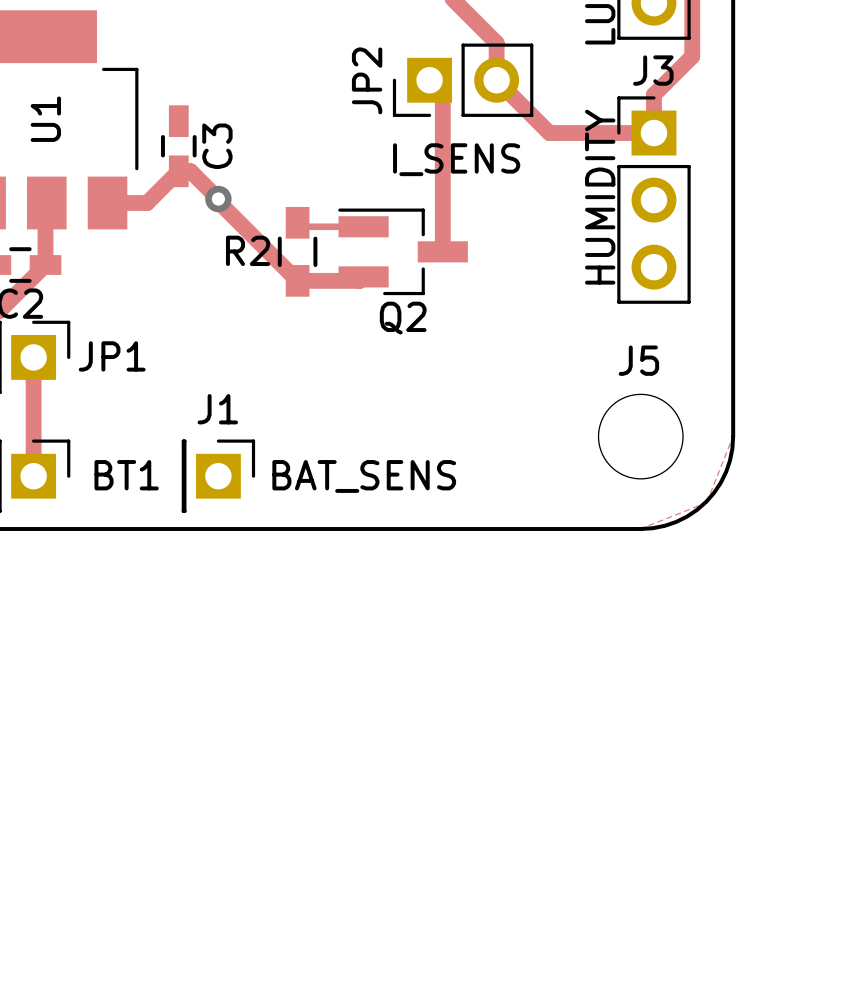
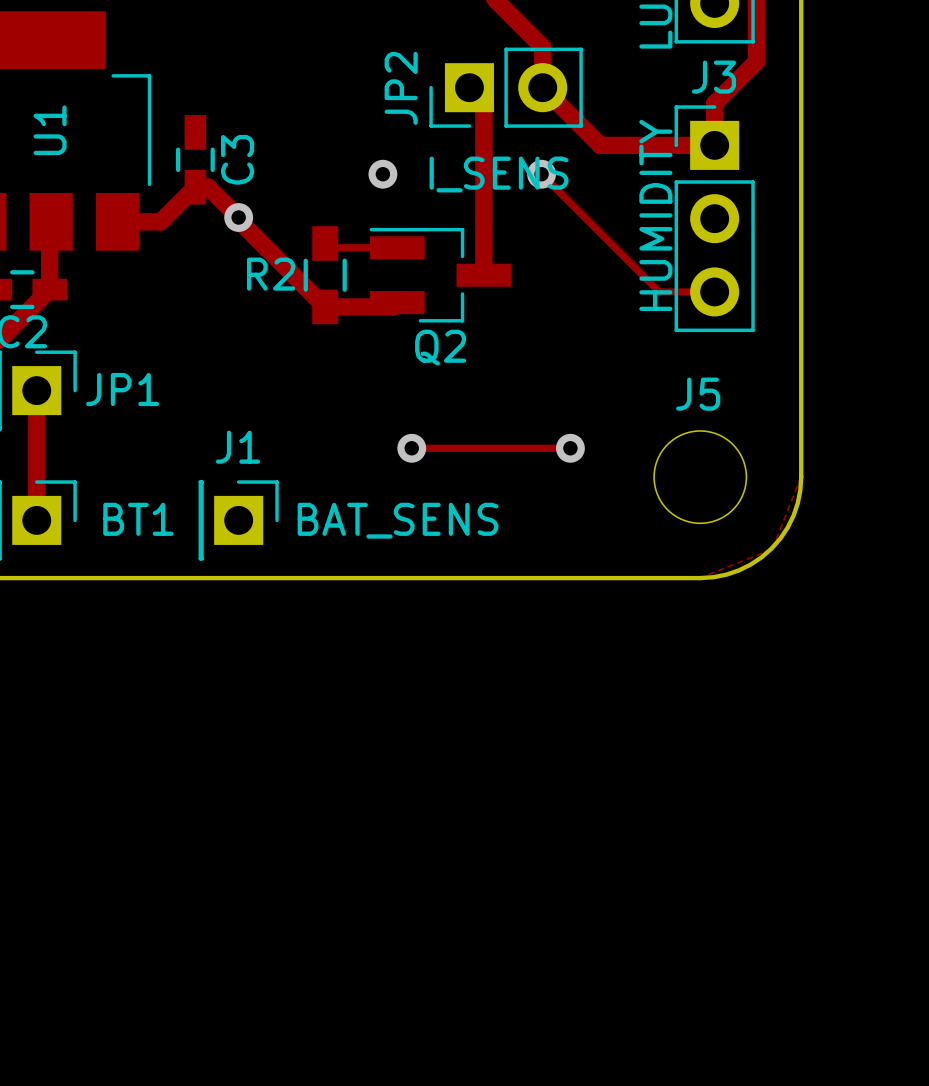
via: none -> (382, 174)
track: none -> (541, 174) (659, 291) (714, 291)
via: none -> (541, 174)
track: none -> (411, 448) (570, 448)
via: none -> (411, 448)
via: none -> (570, 448)

